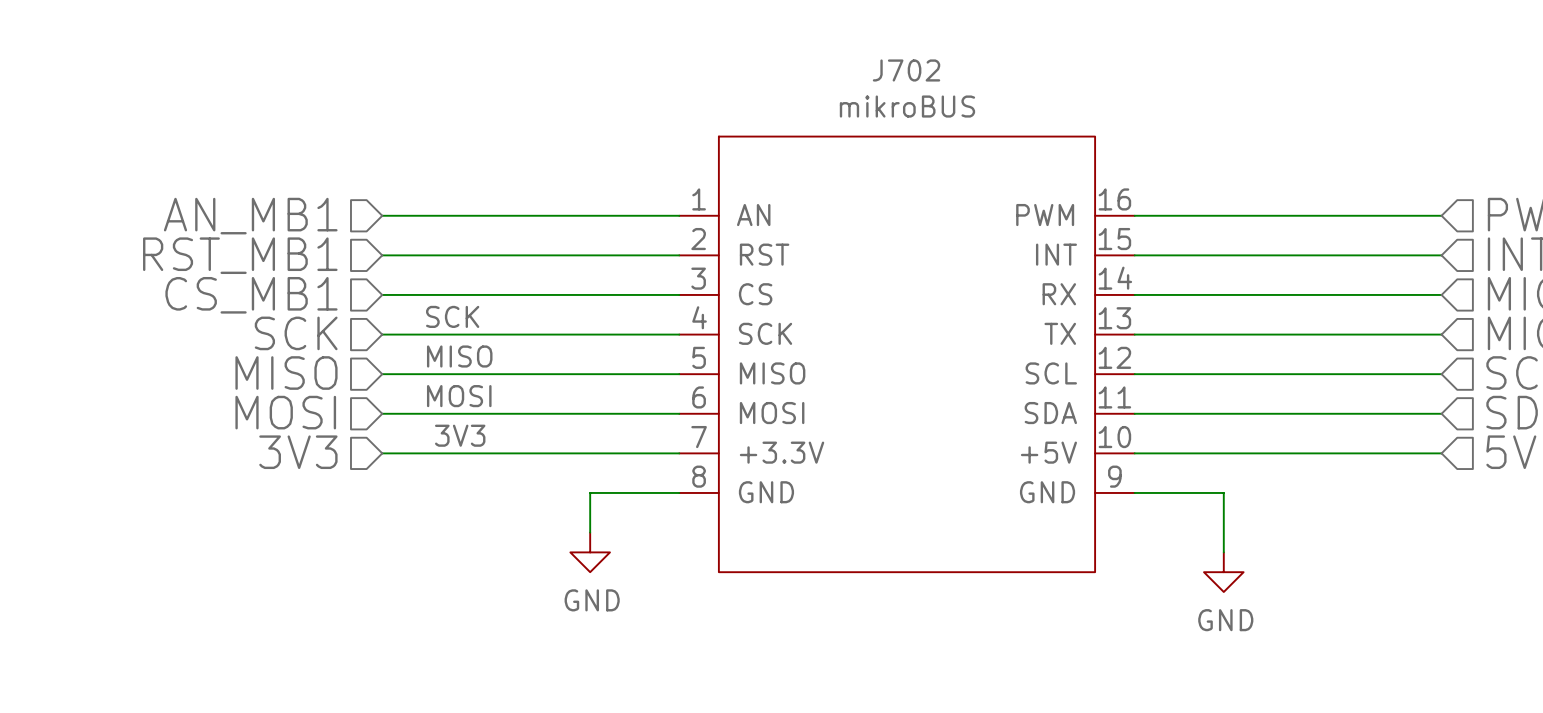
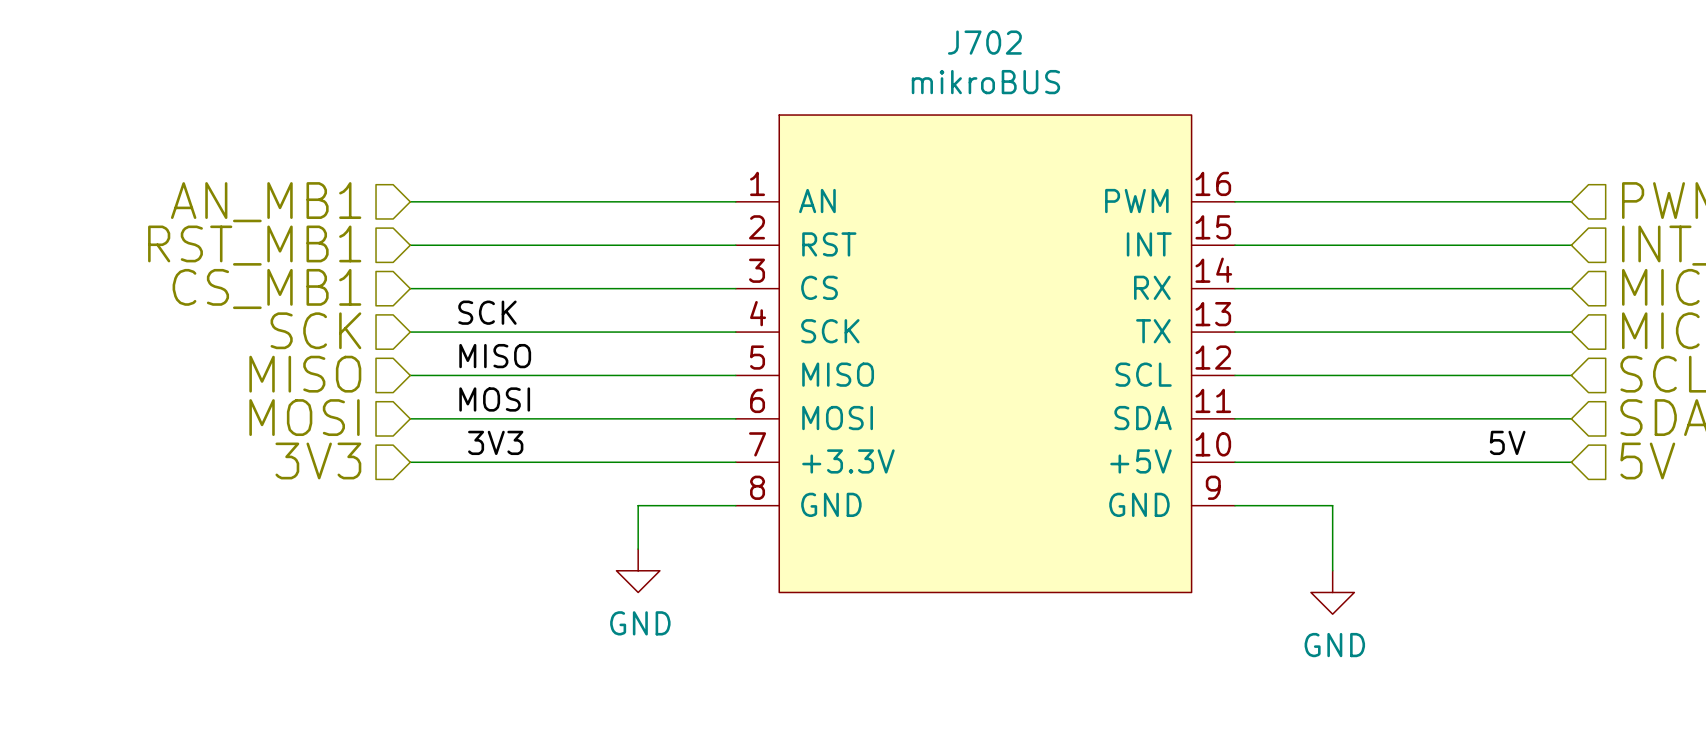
label: none -> 5V (1507, 442)

